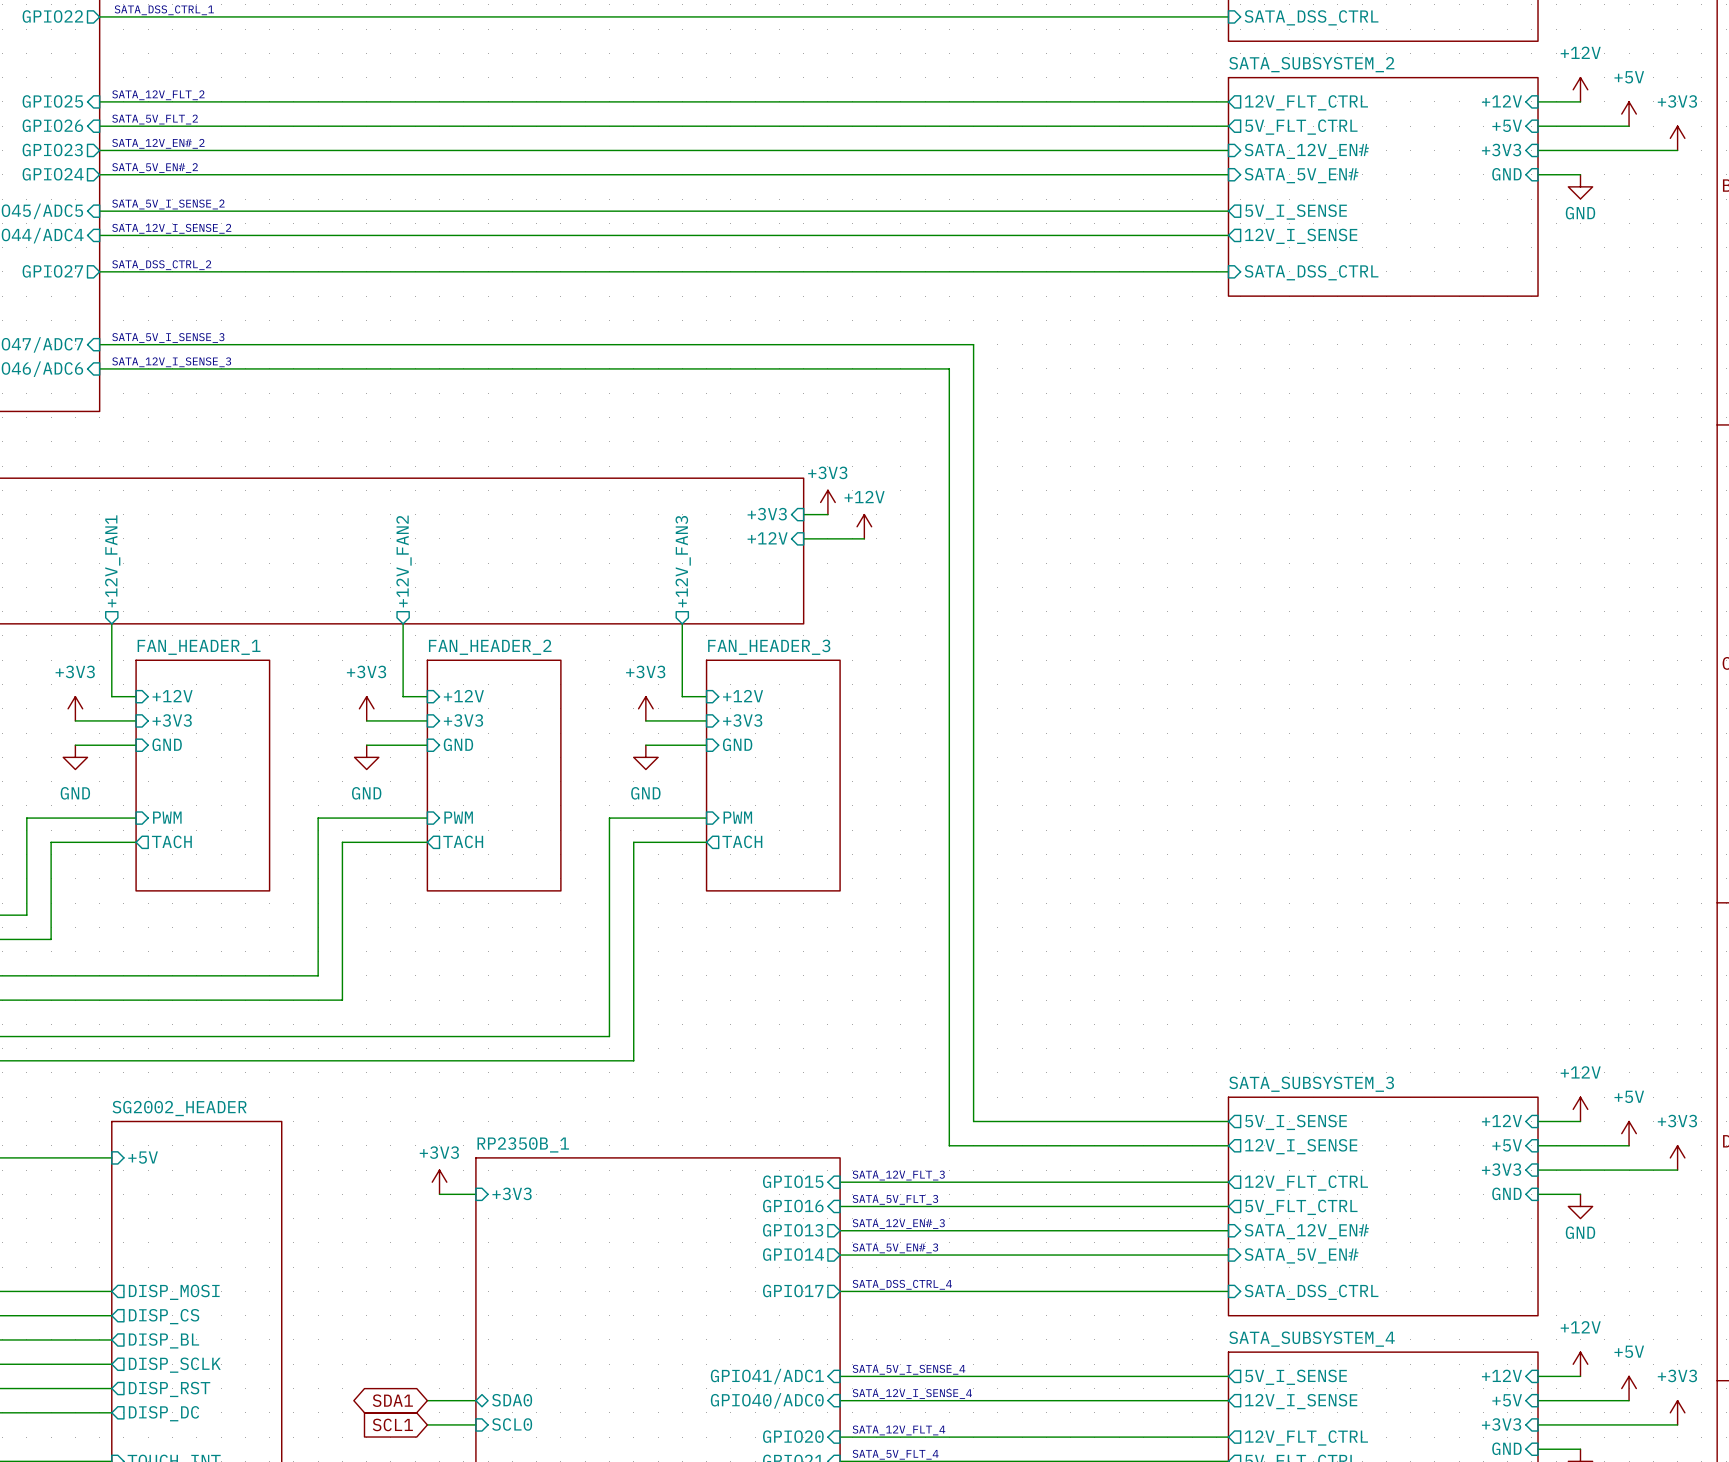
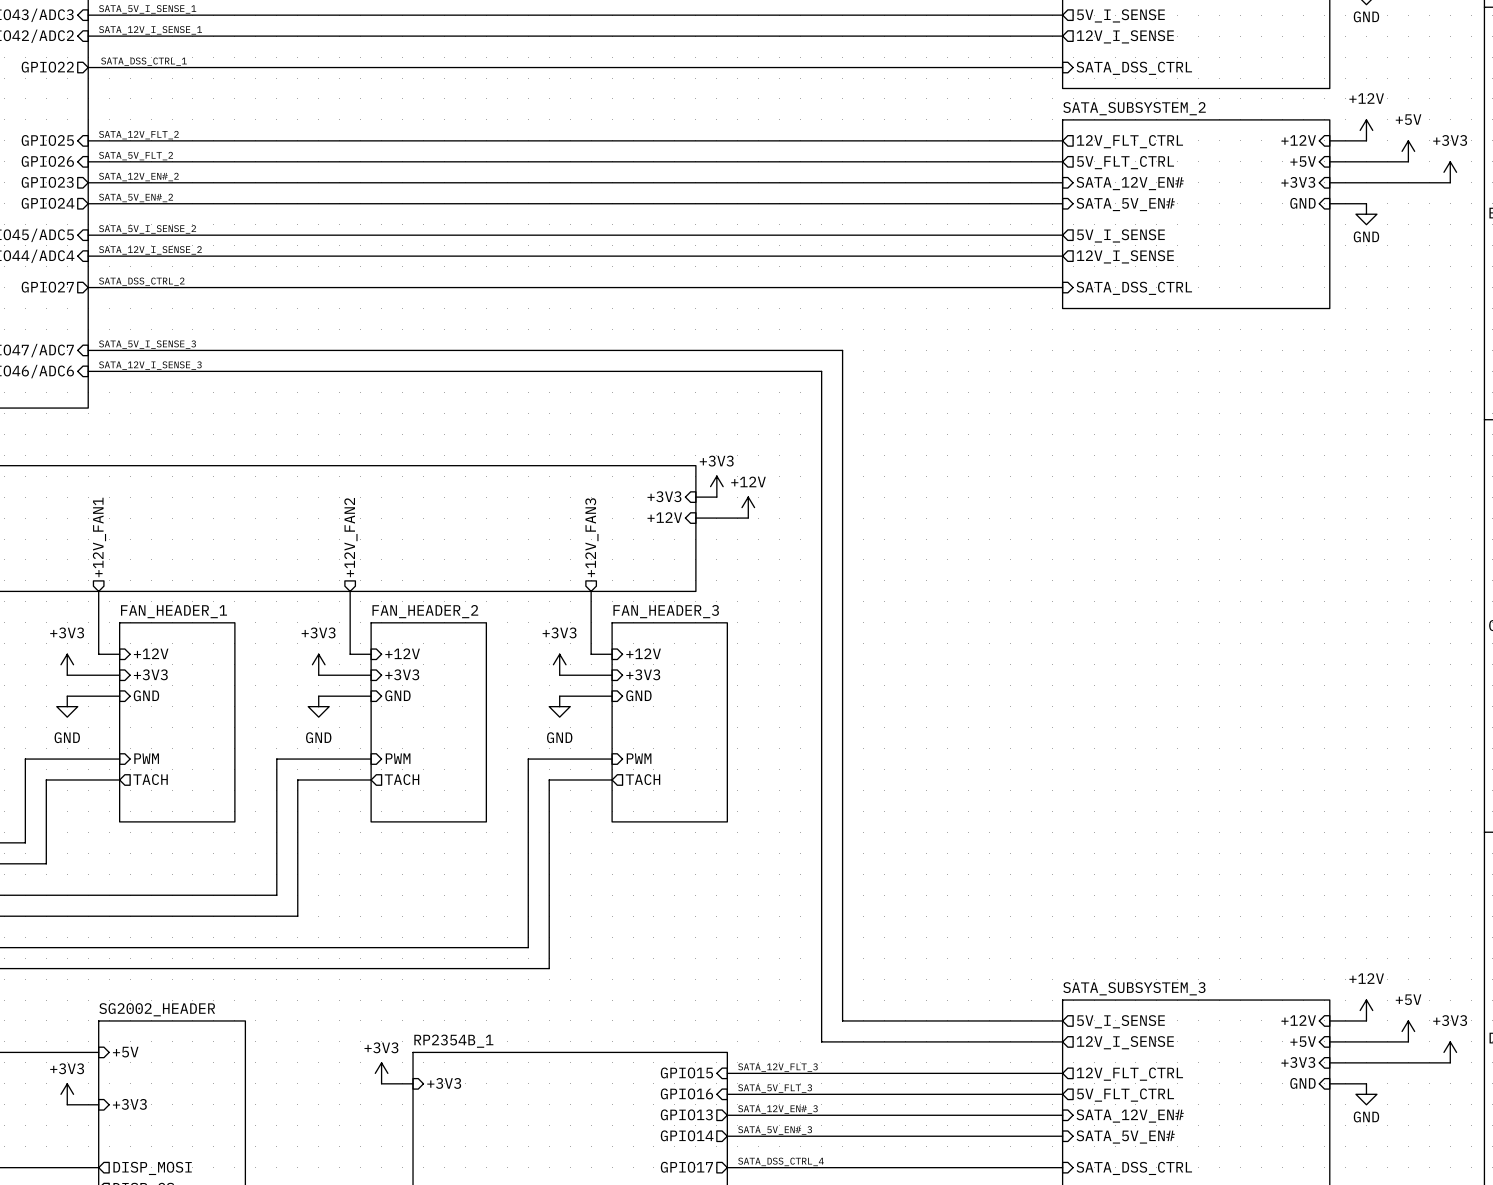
sheet RP2350B_1 name: RP2350B_1 (523, 1144) -> RP2354B_1 (453, 1041)
power symbol: none -> +3V3 (67, 1094)
wire: none -> (67, 1104) (98, 1104)
sheet pin: none -> +3V3 (129, 1104)

